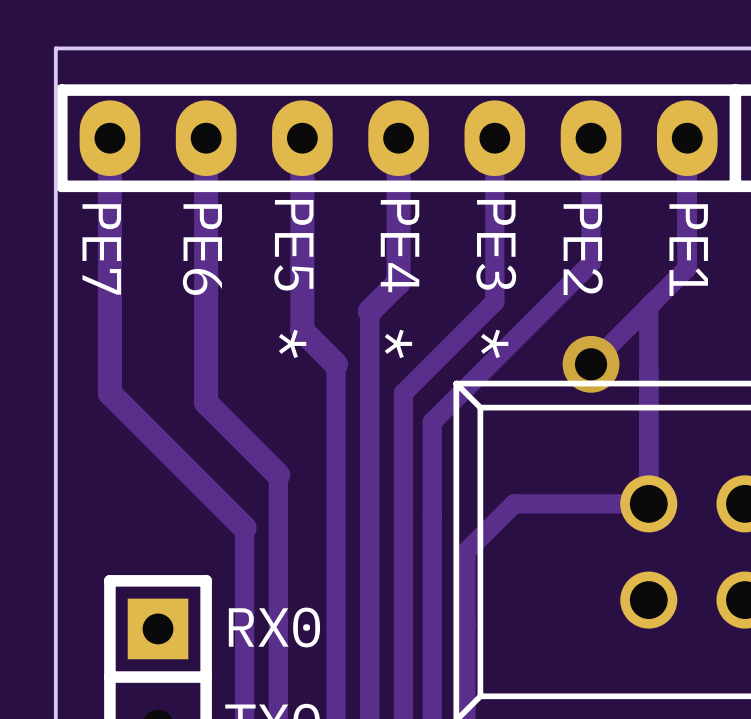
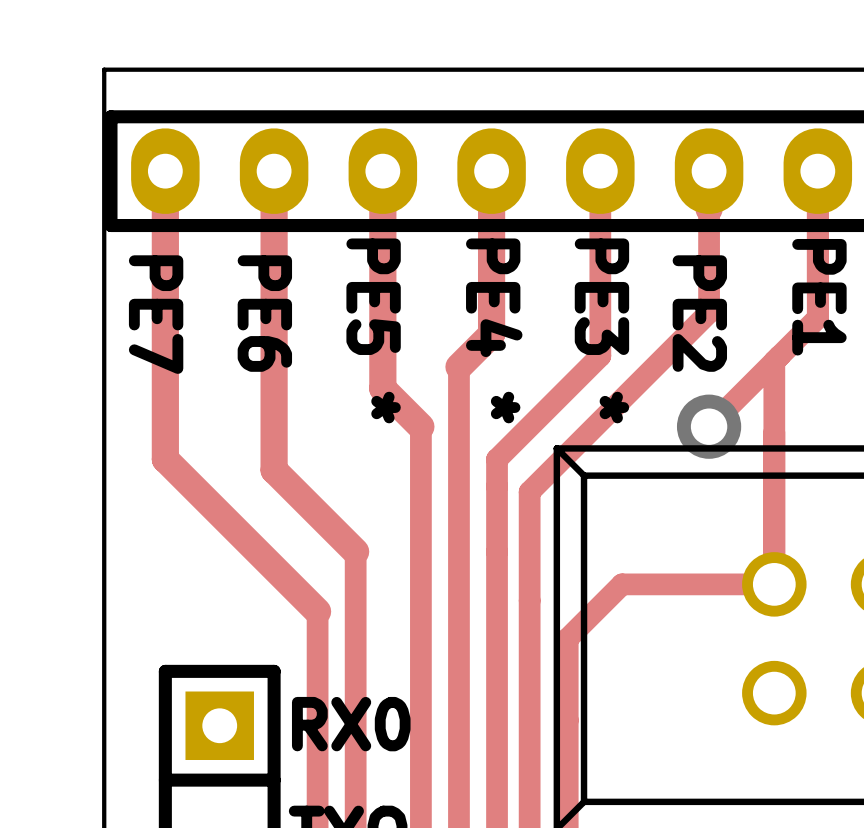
text position: PE7 (101, 249) -> PE7 (156, 314)
text position: PE6 (202, 249) -> PE6 (264, 313)
text position: PE2 (583, 249) -> PE2 (699, 313)

